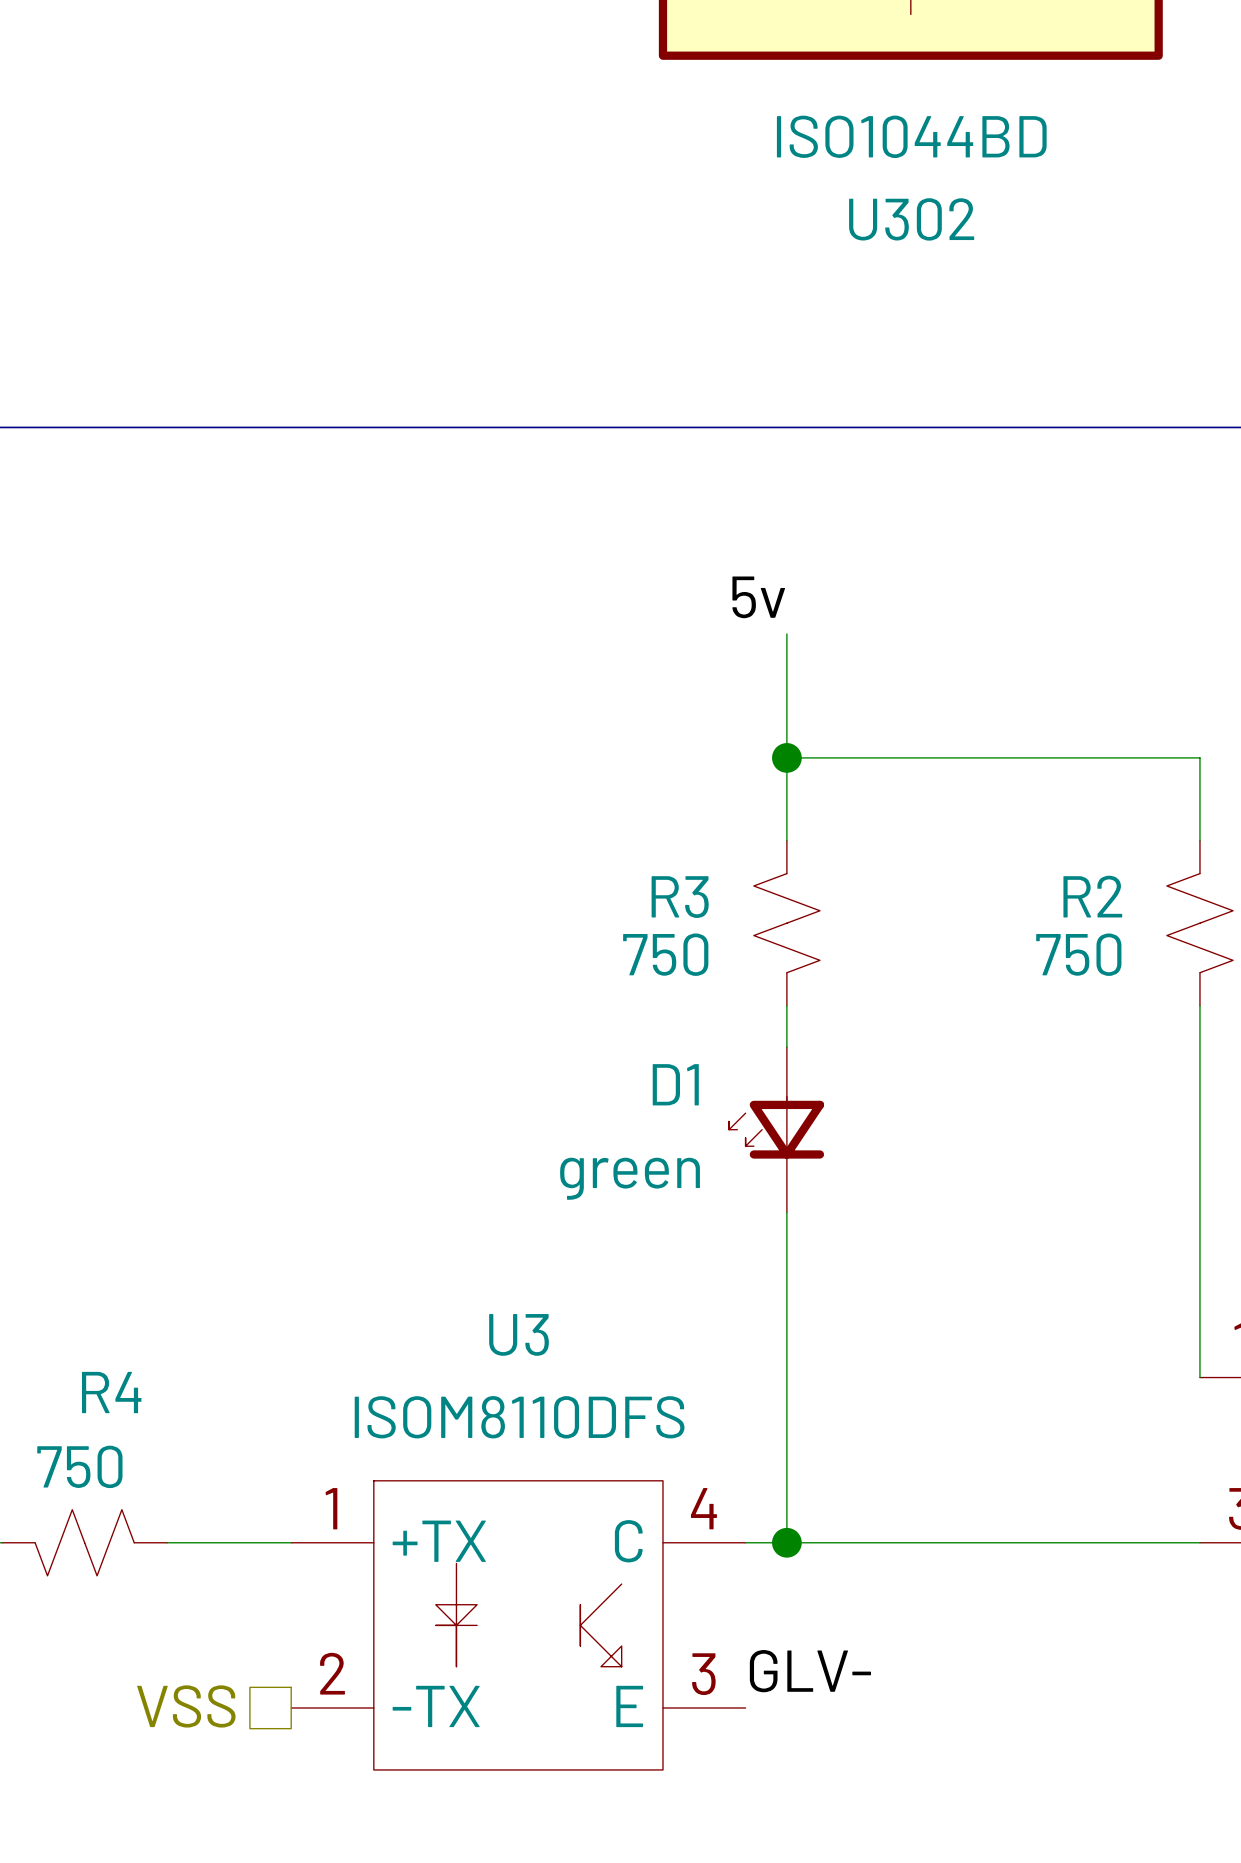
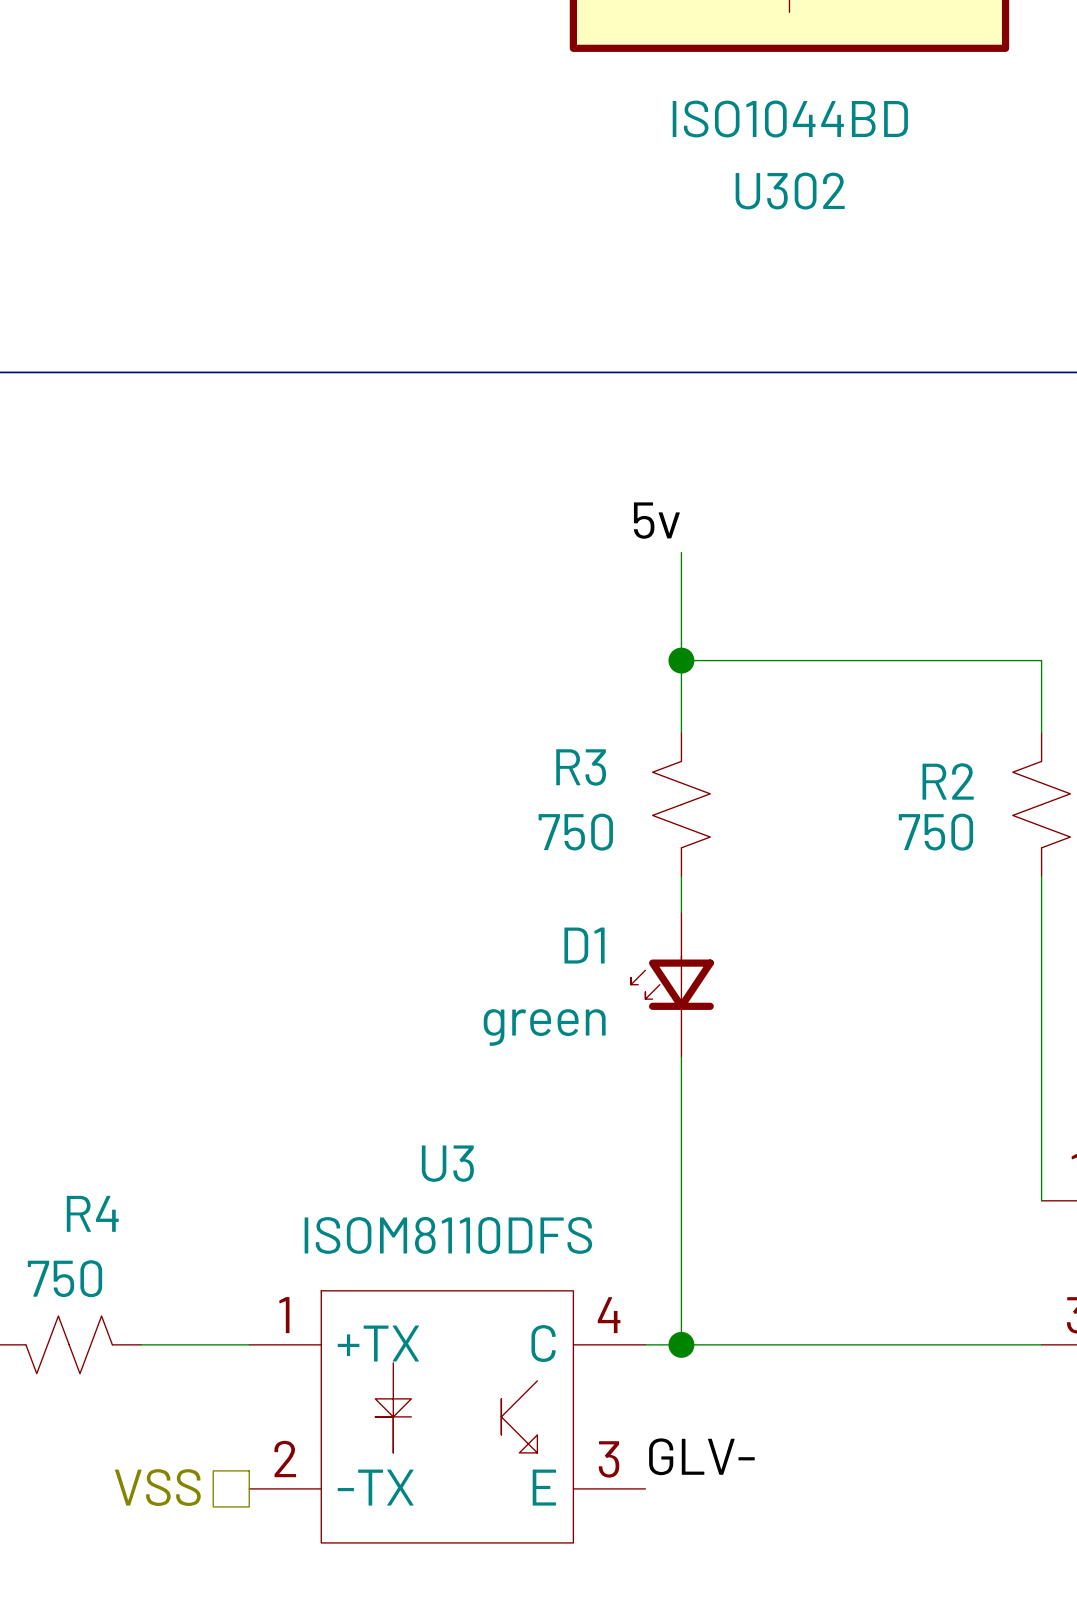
R3 name position: R3 (680, 897) -> R3 (581, 767)

